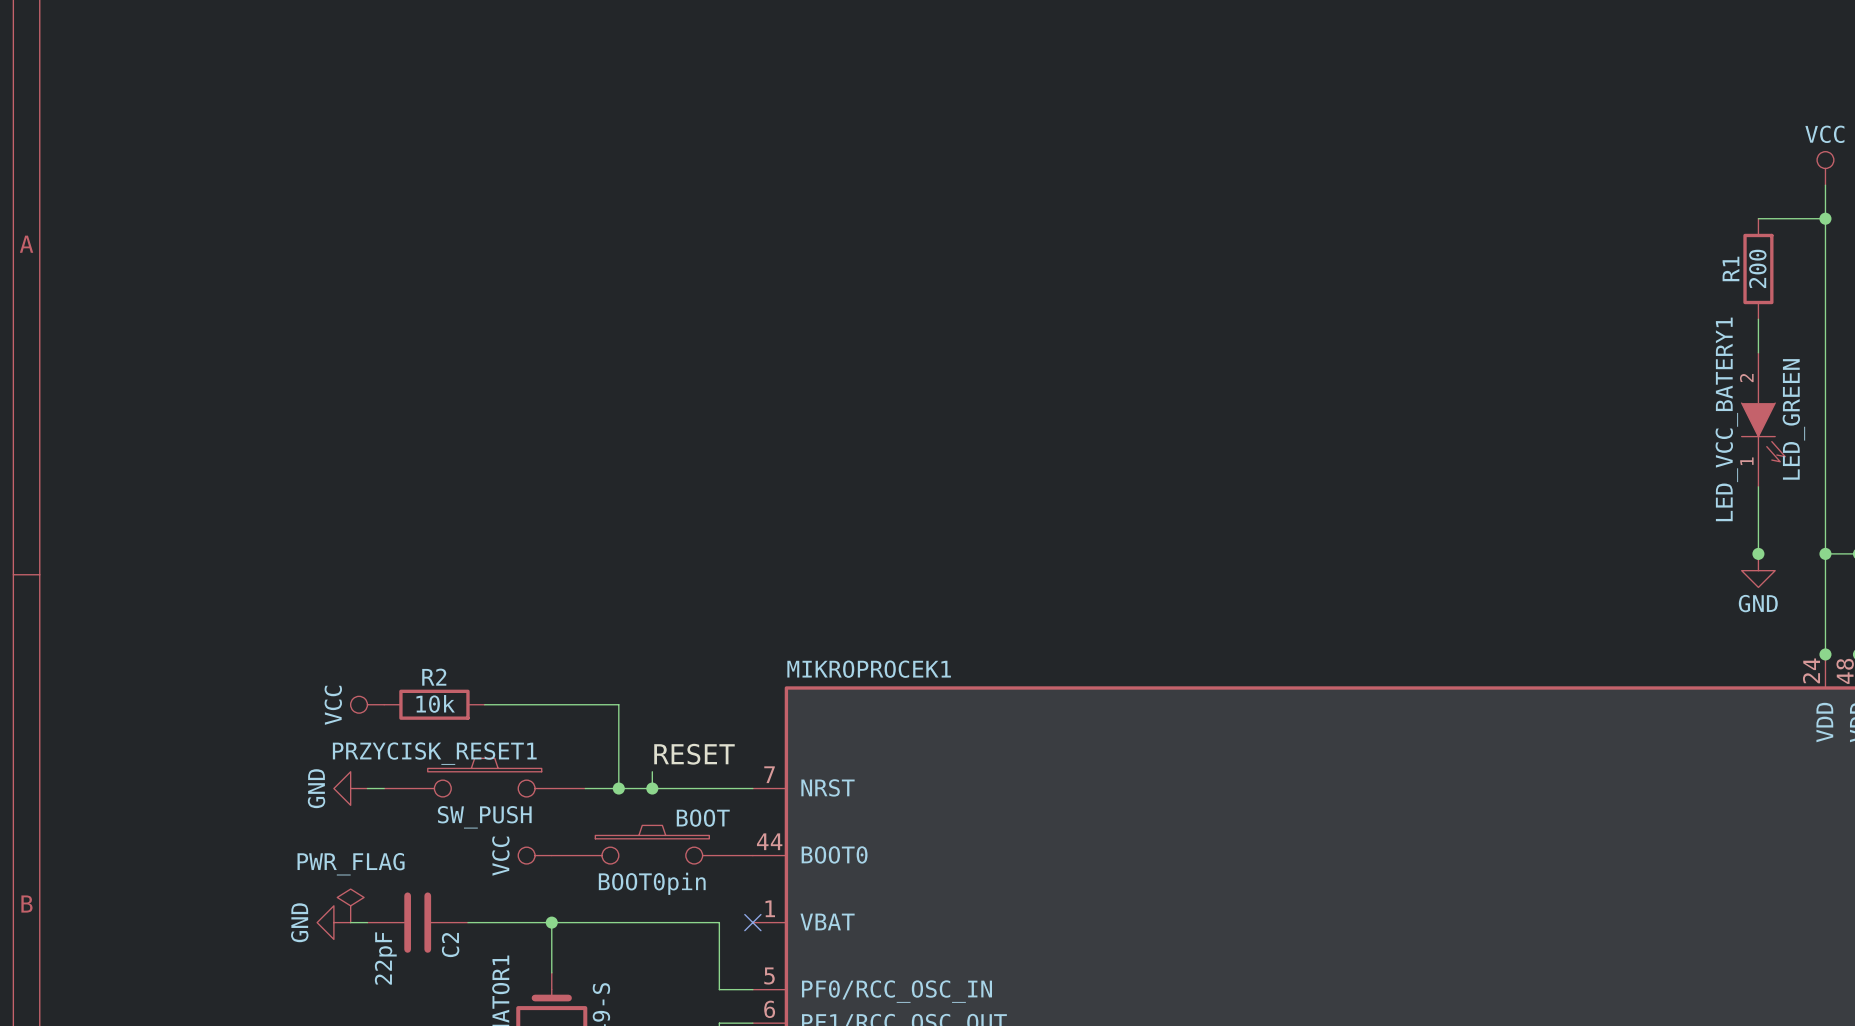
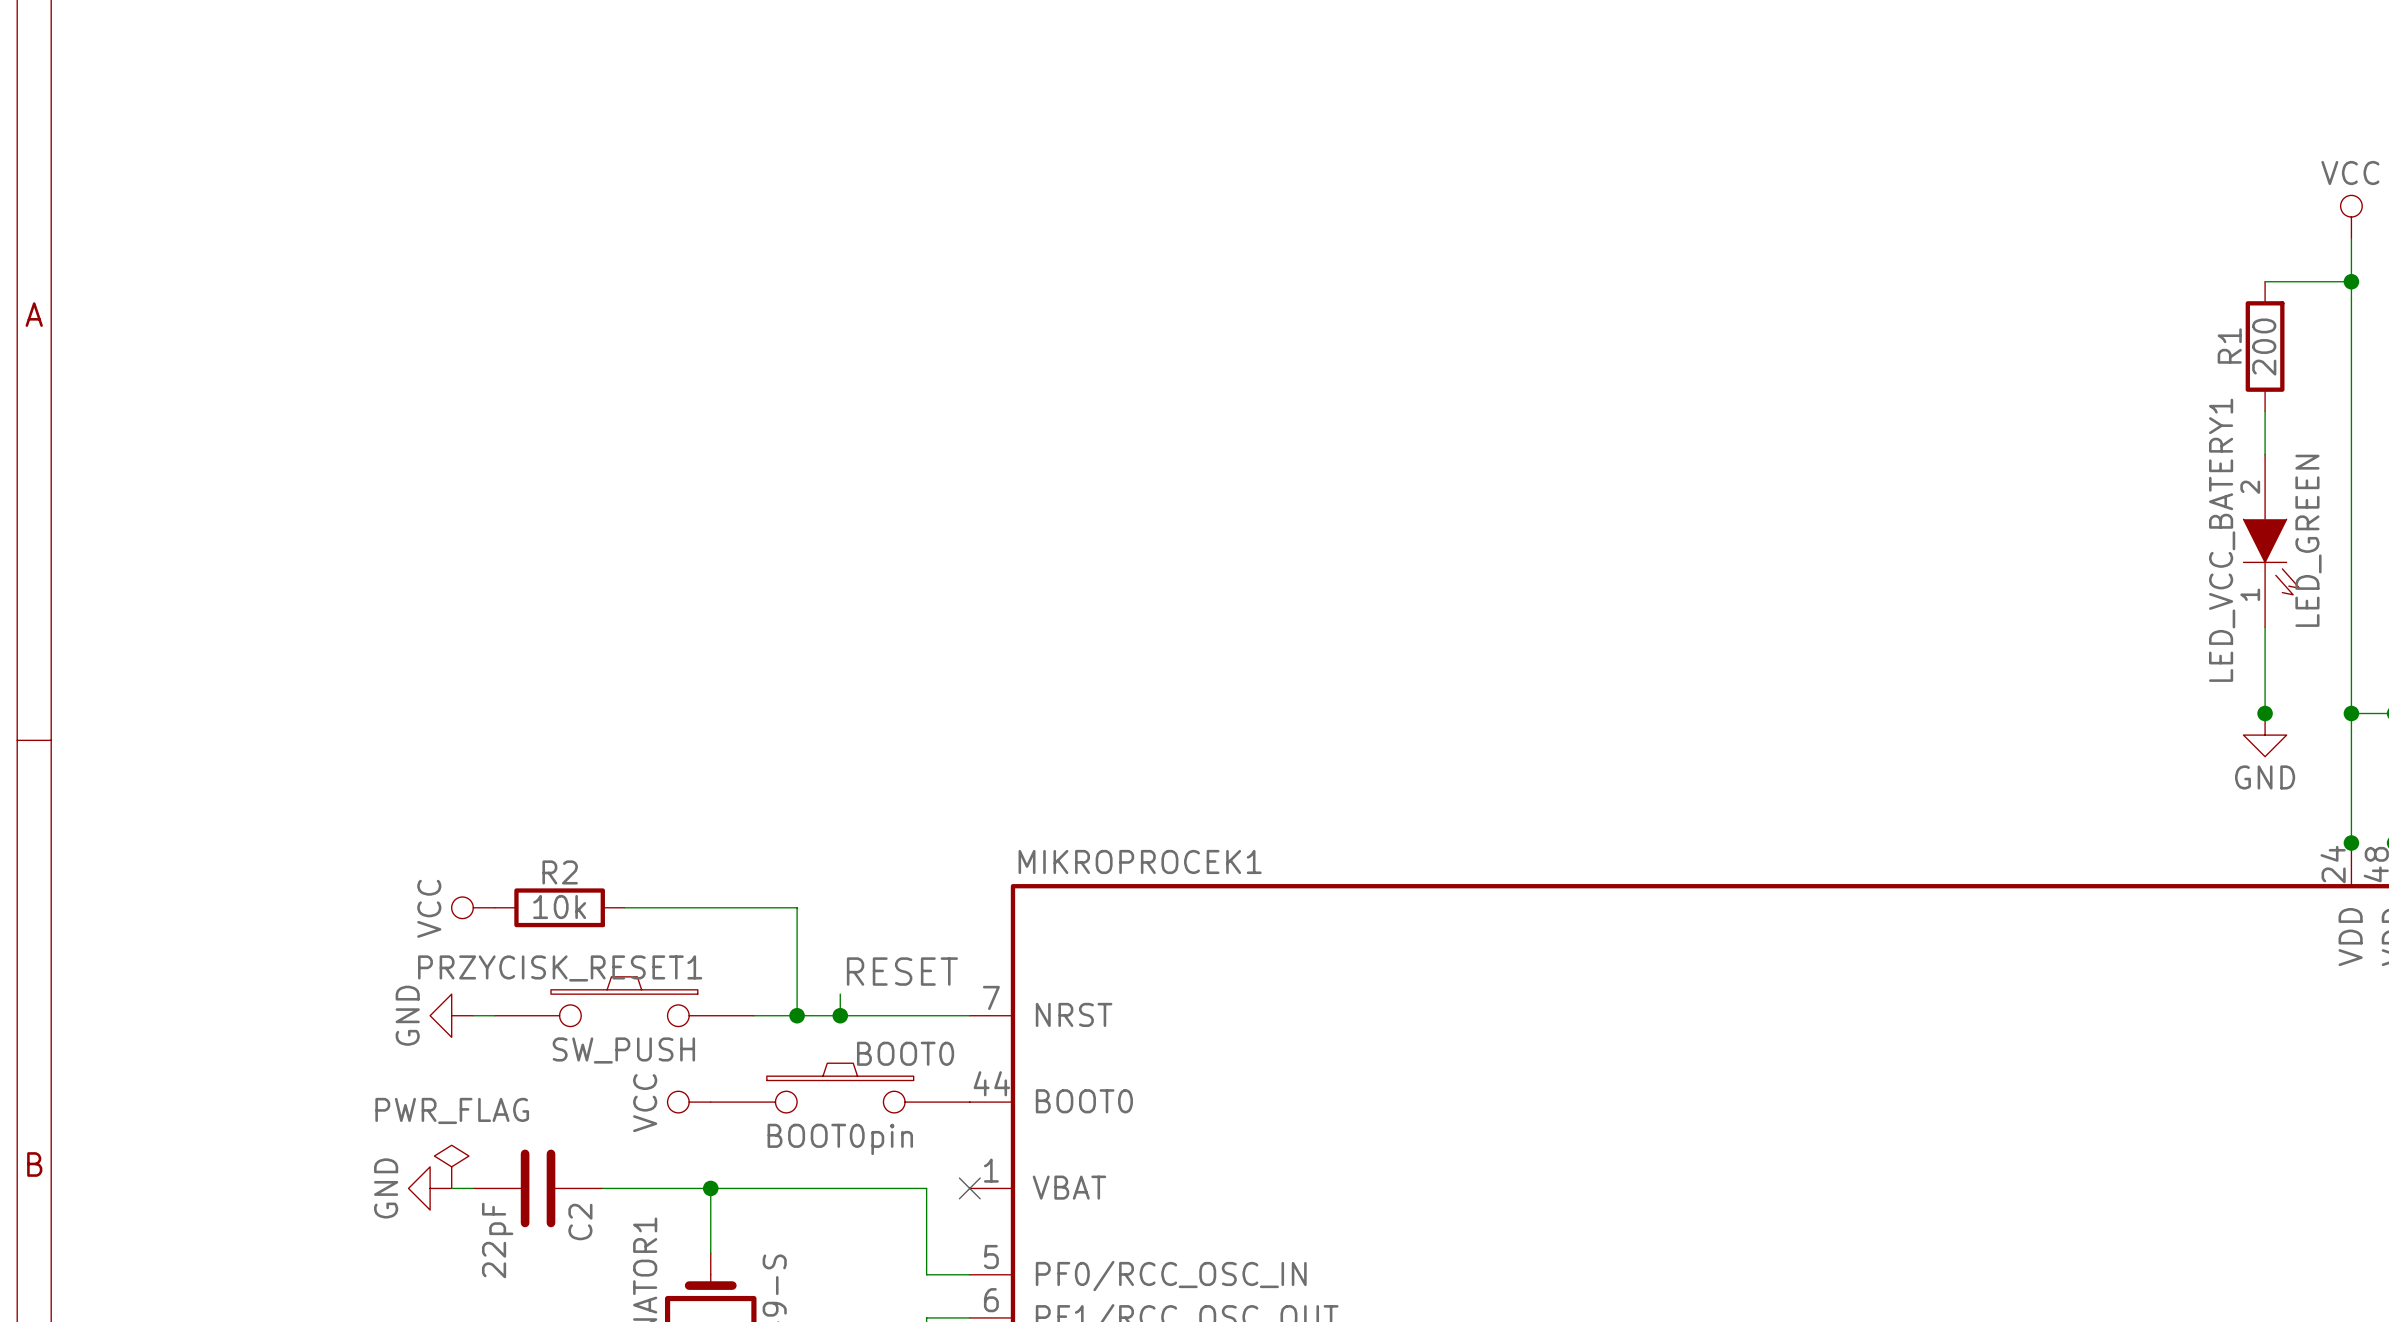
BOOT name: BOOT (703, 818) -> BOOT0 (905, 1053)

